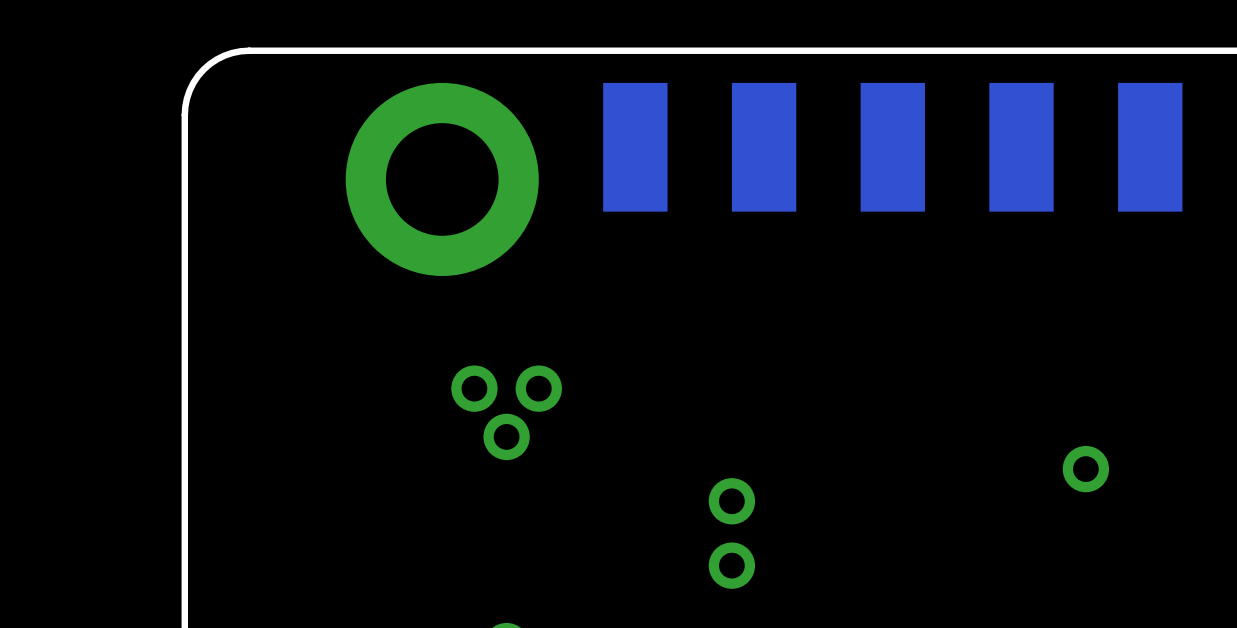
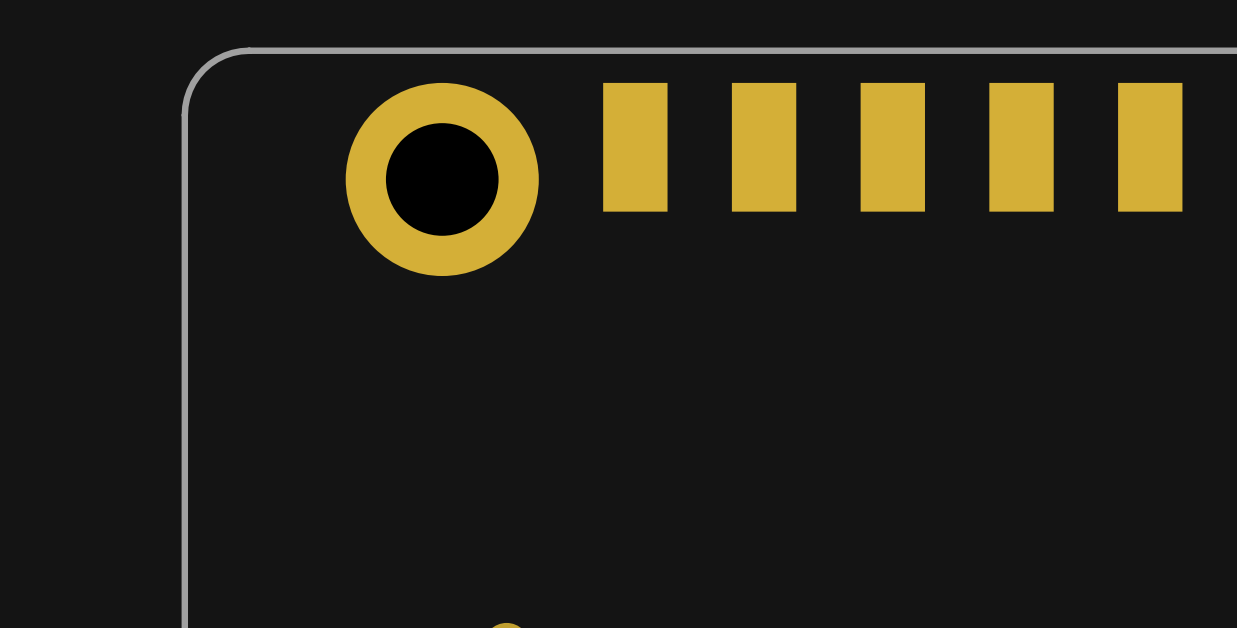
via: (474, 388) -> none
via: (538, 388) -> none
via: (506, 436) -> none
via: (1085, 469) -> none
via: (731, 501) -> none
via: (731, 565) -> none

